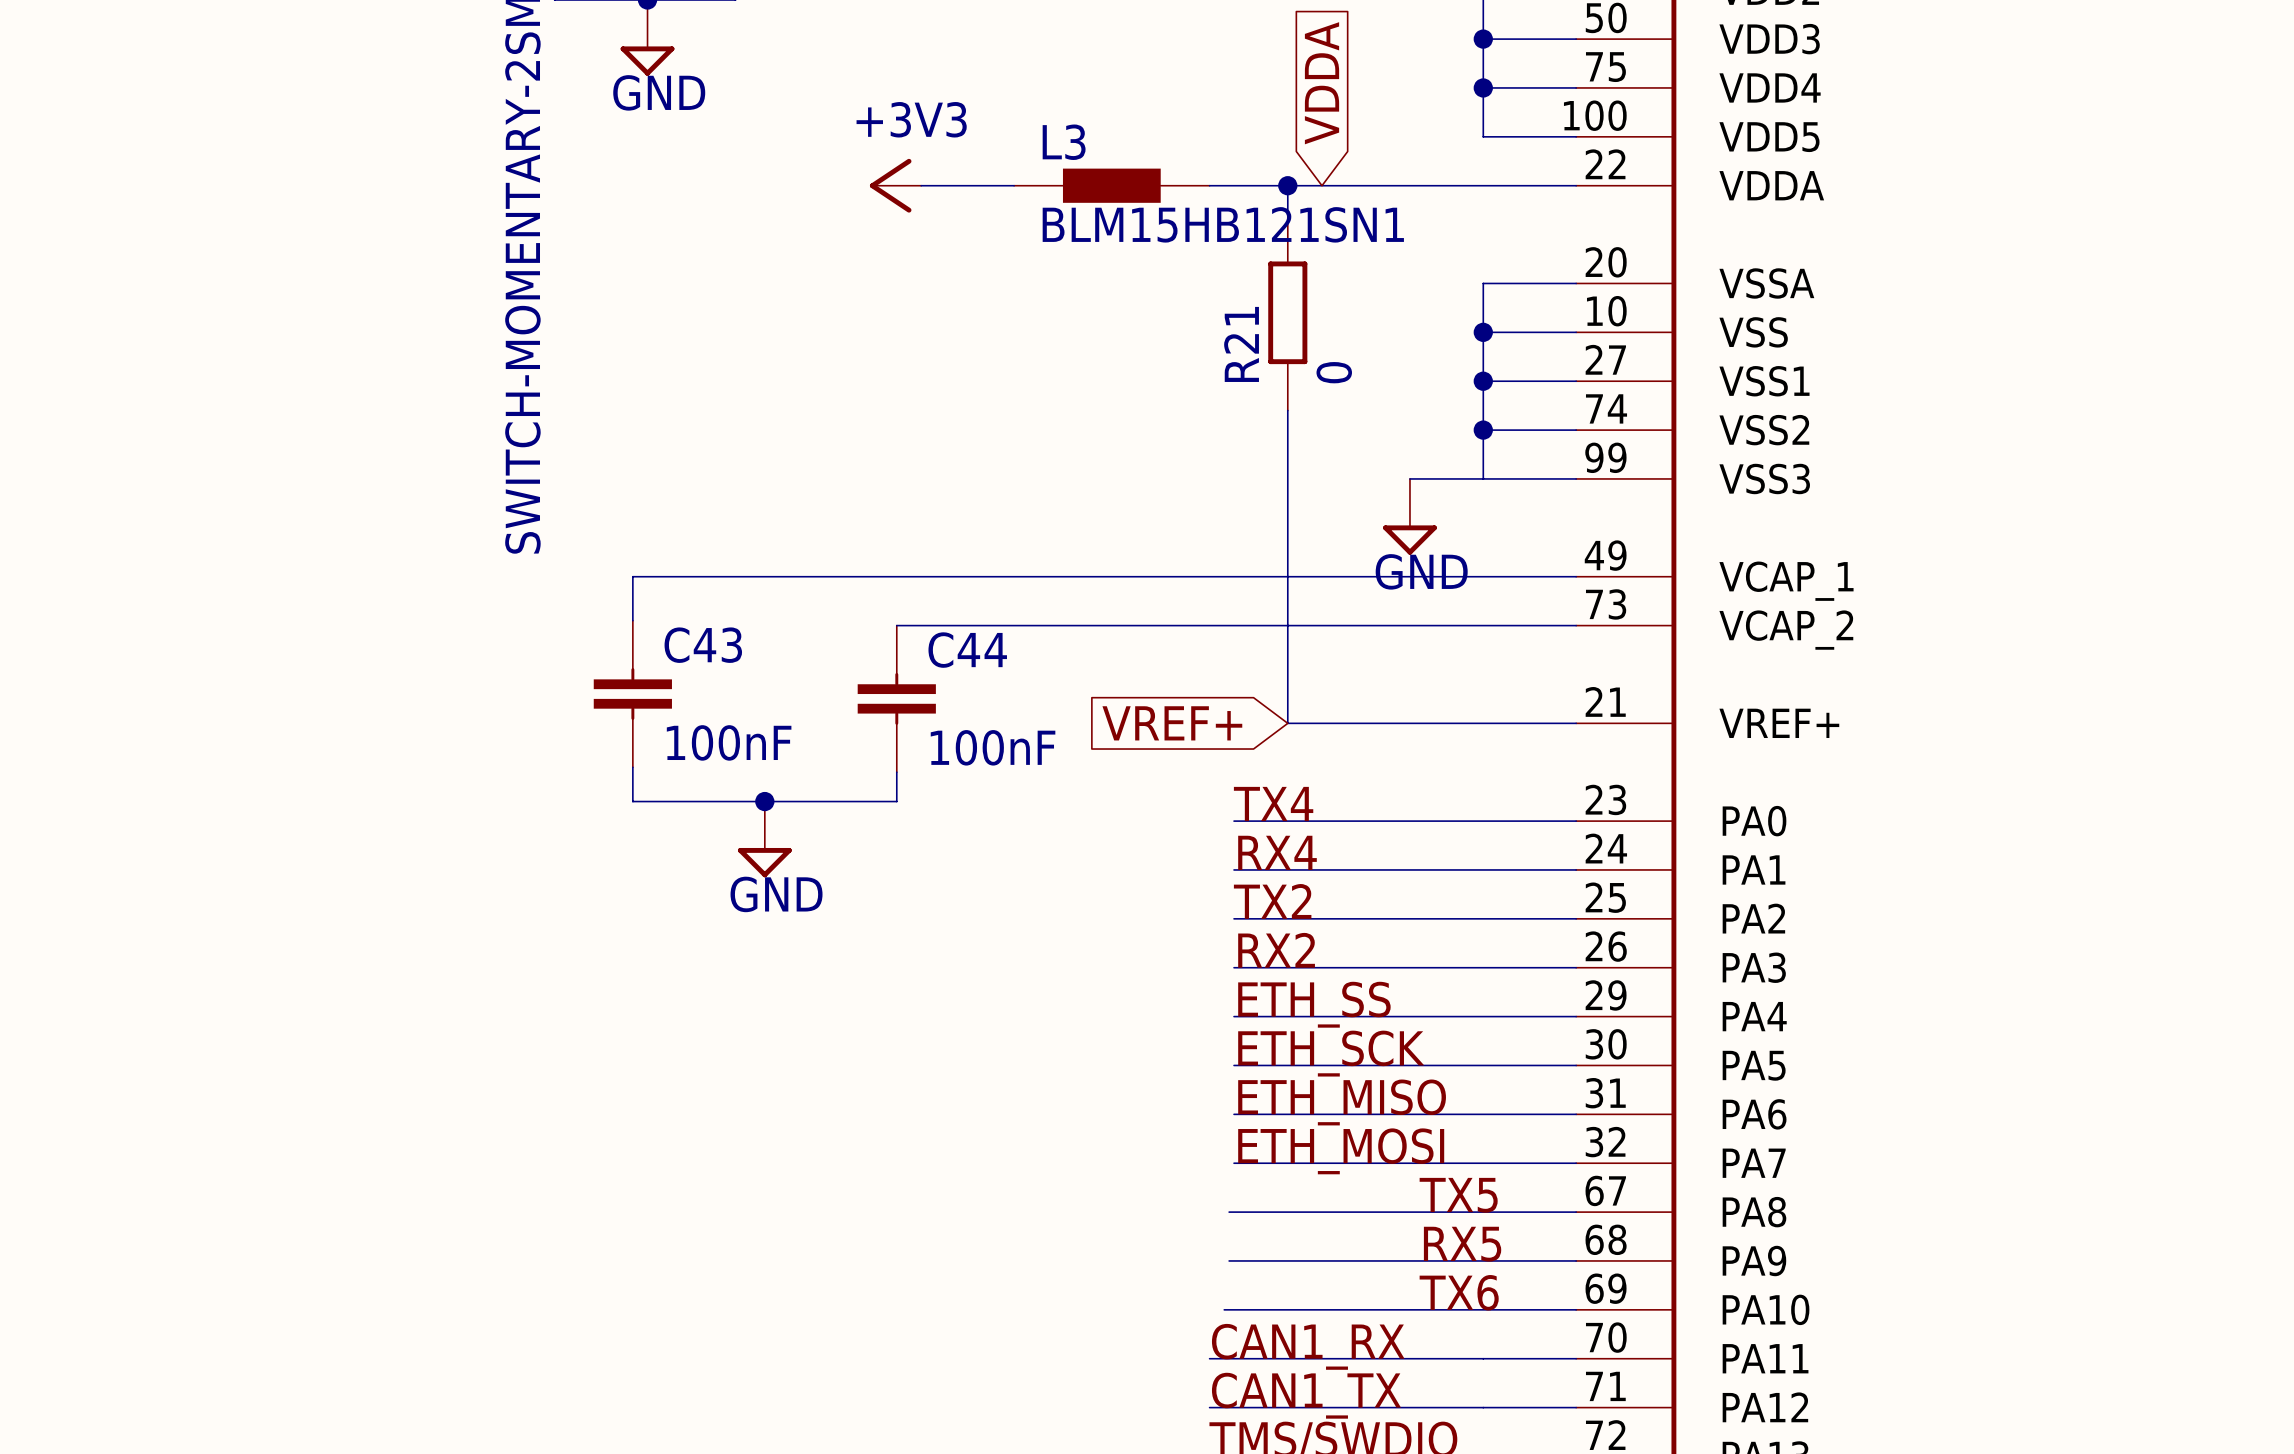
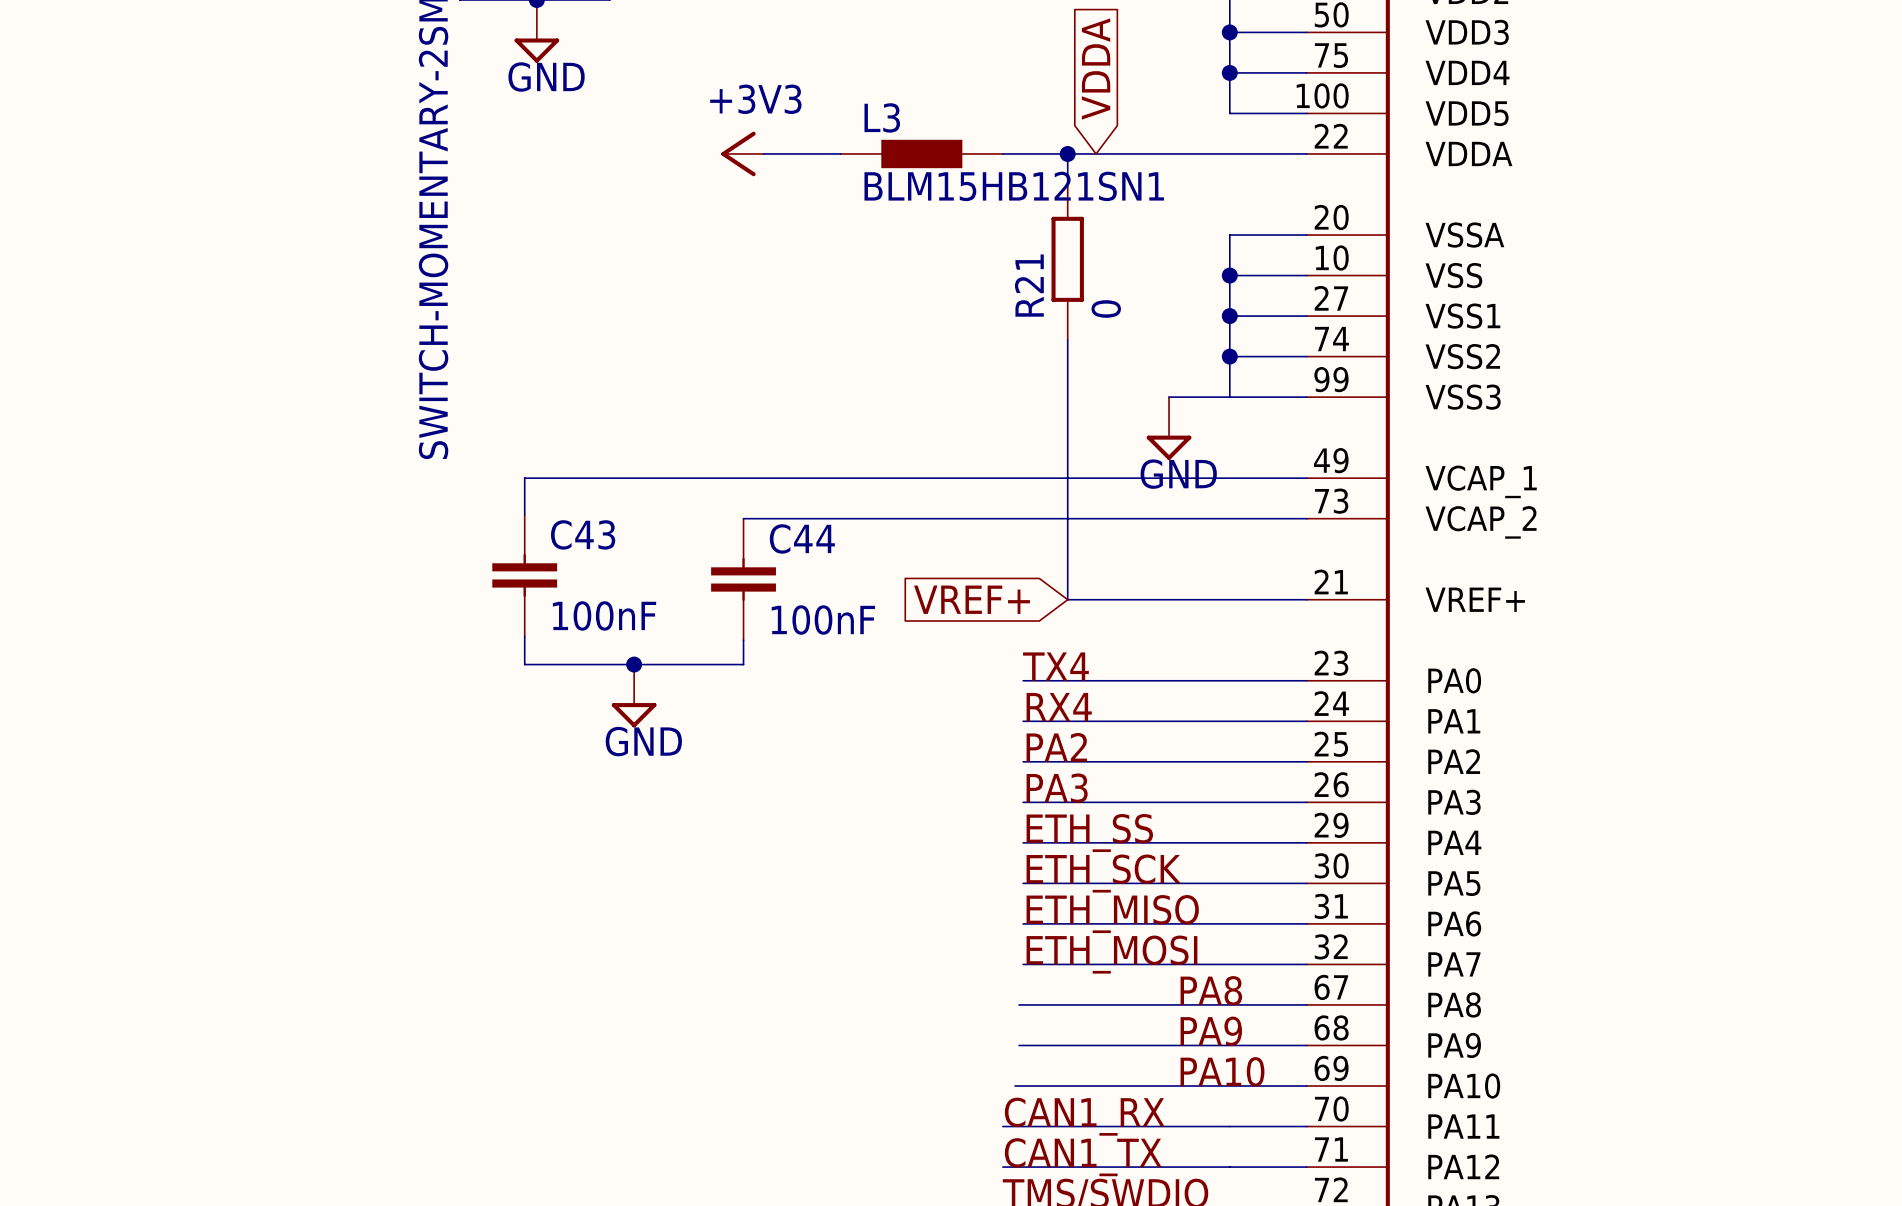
label: TX2 (1272, 901) -> PA2 (1056, 747)
label: RX2 (1276, 950) -> PA3 (1057, 788)
label: TX5 (1458, 1195) -> PA8 (1211, 990)
label: RX5 (1462, 1244) -> PA9 (1211, 1031)
label: TX6 (1459, 1292) -> PA10 (1222, 1071)

